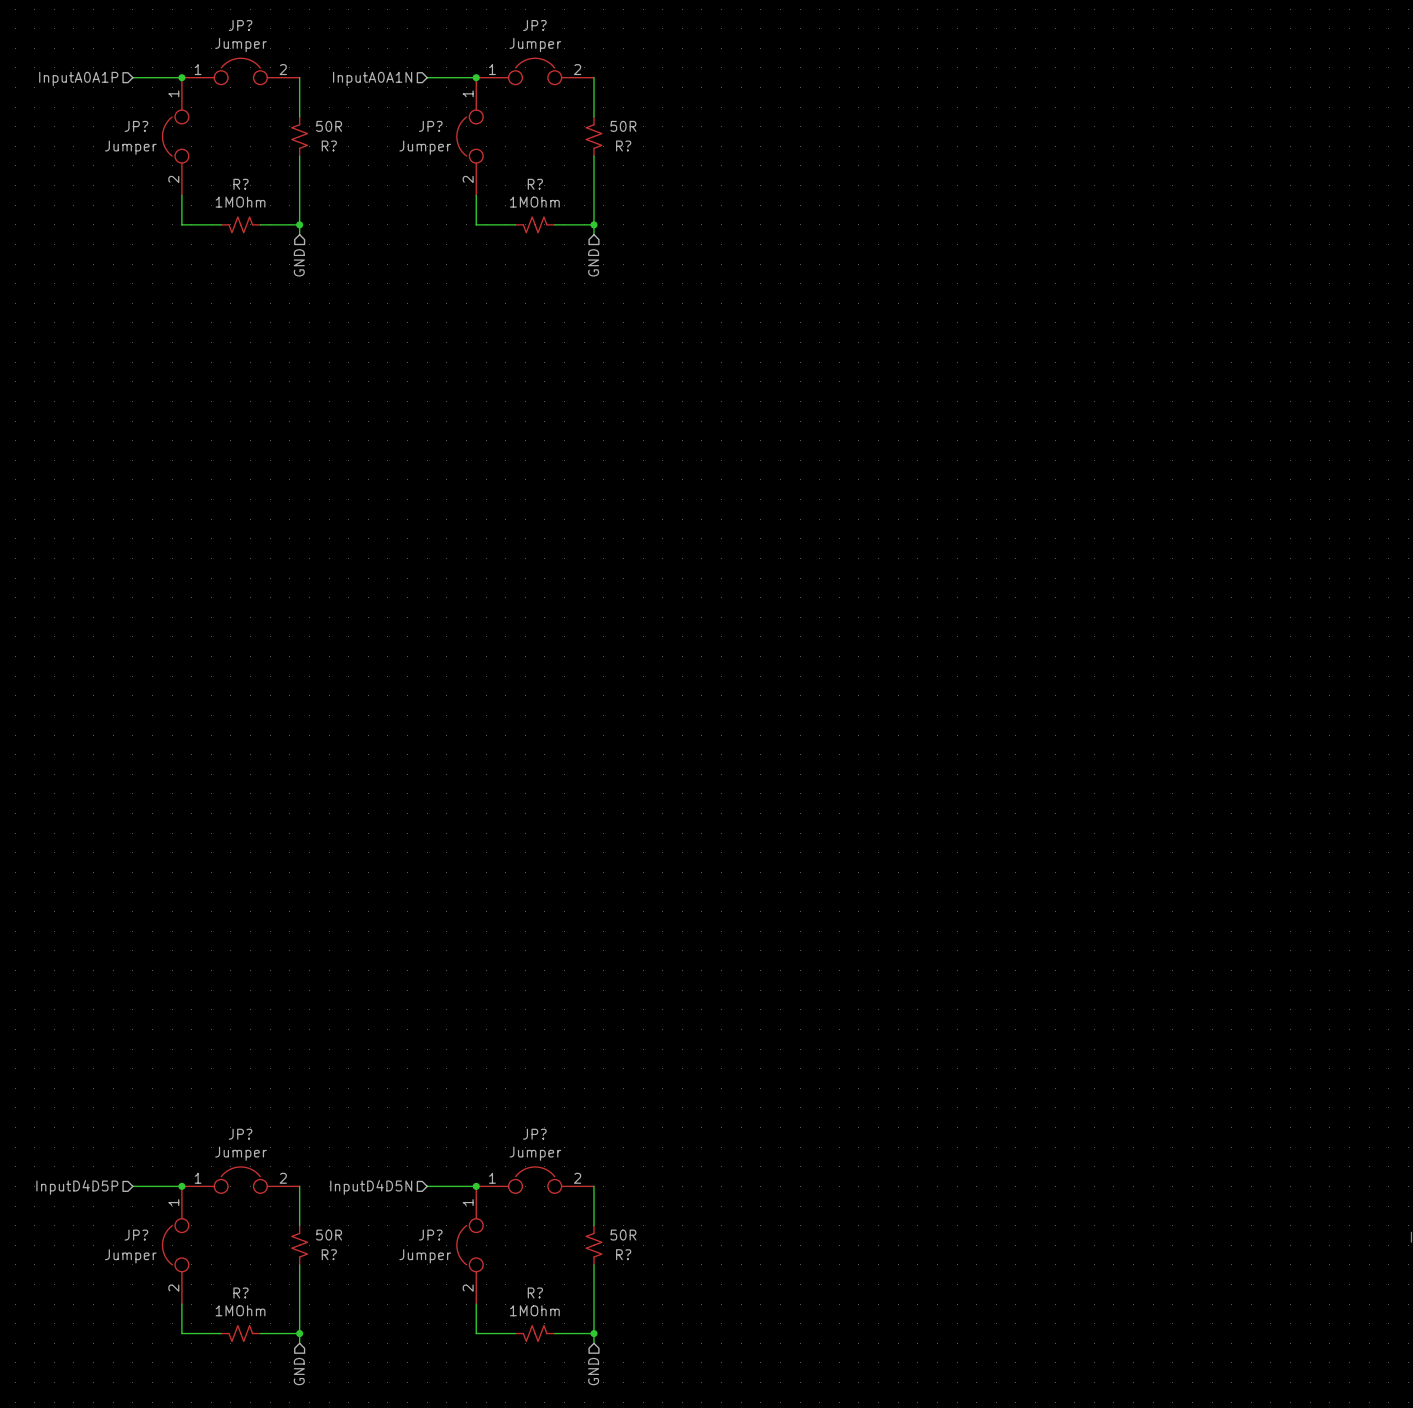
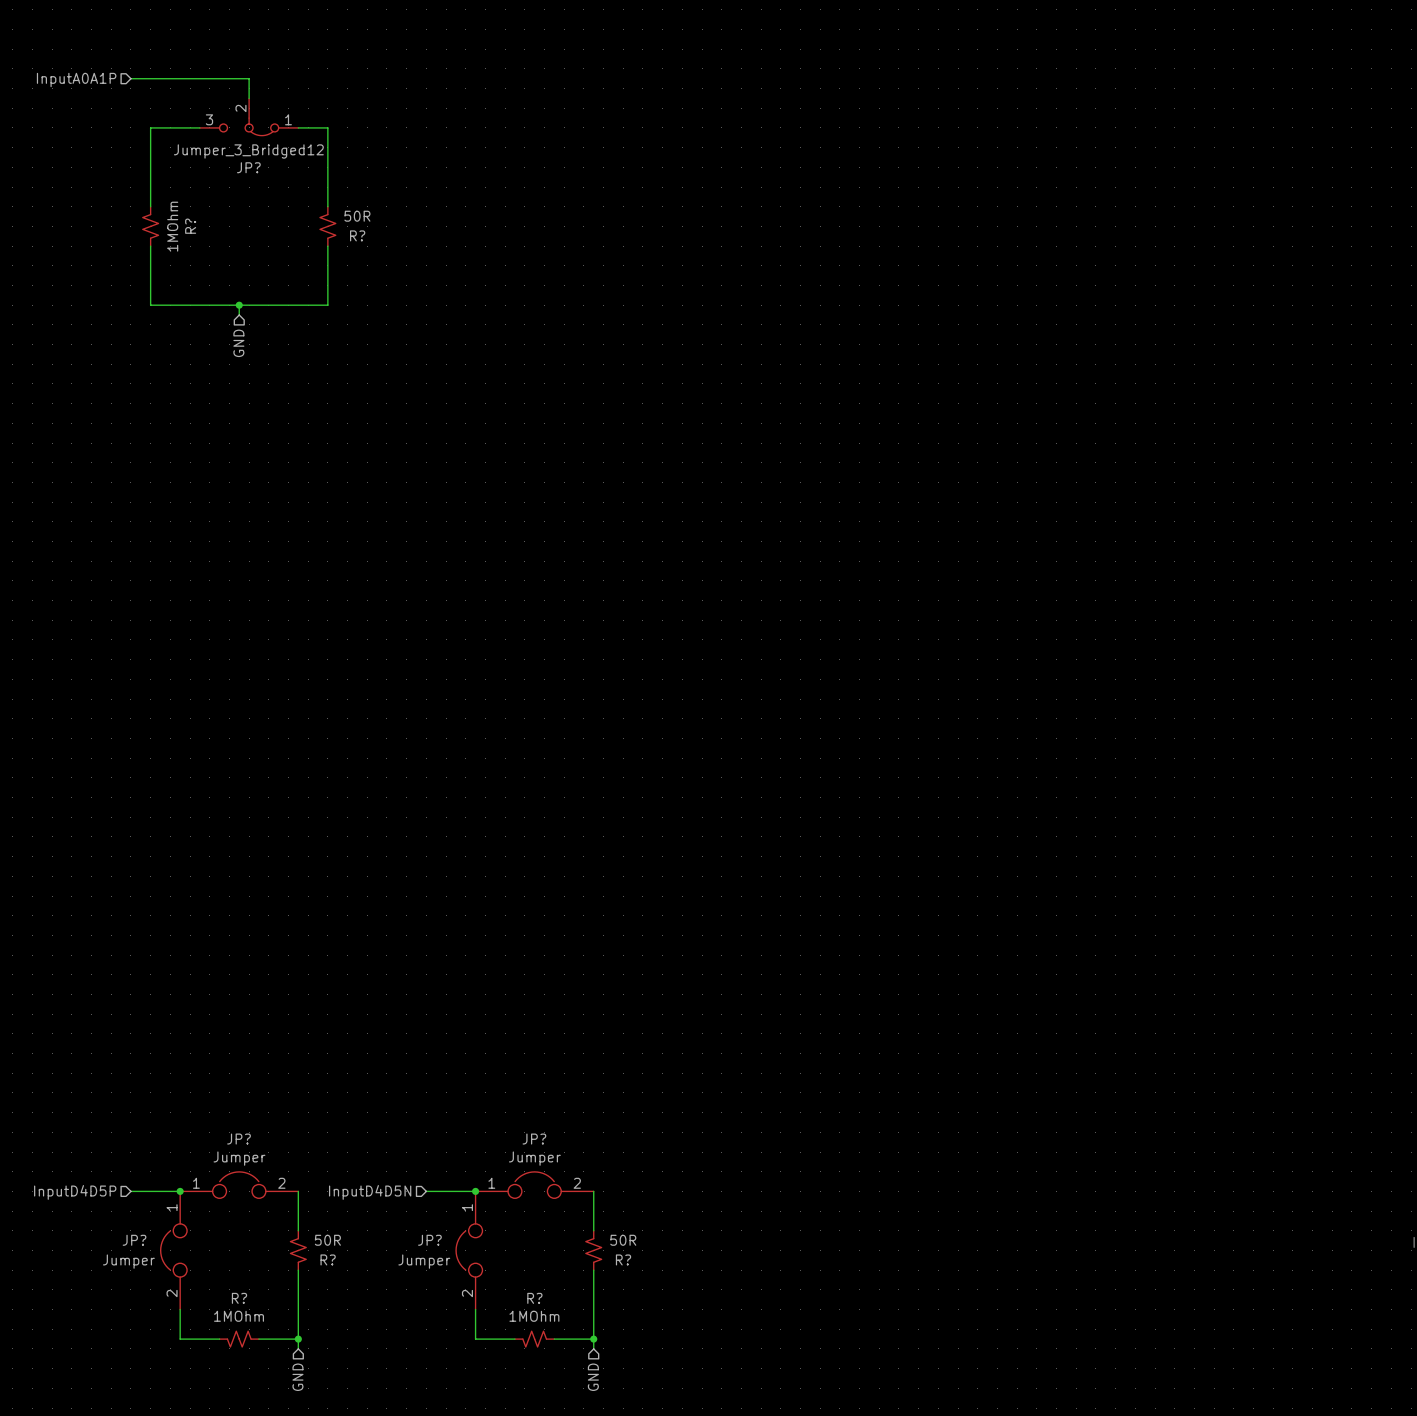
JP?: Jumper (240, 71) -> none
JP?: Jumper (535, 71) -> none
wire: none -> (180, 78) (249, 78) (249, 98)
junction: (181, 77) -> none
wire: (299, 77) (299, 116) -> none
wire: (427, 77) (476, 77) -> none
junction: (476, 77) -> none
wire: (593, 77) (593, 116) -> none
hierarchical label: InputA0A1N (372, 78) -> none
JP?: none -> Jumper_3_Bridged12 (249, 117)
wire: none -> (199, 127) (150, 127) (150, 206)
wire: none -> (298, 127) (327, 127) (327, 206)
JP?: Jumper (175, 136) -> none
R? position: (299, 136) -> (327, 226)
JP?: Jumper (469, 136) -> none
R?: 50R (593, 136) -> none
wire: (299, 156) (299, 234) -> none
wire: (593, 156) (593, 234) -> none
wire: (181, 195) (181, 224) (221, 224) -> none
wire: (476, 195) (476, 224) (515, 224) -> none
R? rotation: 0° (240, 224) -> 90° clockwise (150, 226)
R? position: (240, 224) -> (150, 226)
wire: (260, 224) (299, 224) -> none
junction: (299, 224) -> none
R?: 1MOhm (535, 224) -> none
wire: (554, 224) (593, 224) -> none
junction: (593, 224) -> none
wire: none -> (150, 246) (150, 305) (327, 305) (327, 246)
hierarchical label position: GND (299, 262) -> GND (238, 343)
hierarchical label: GND (593, 262) -> none
wire: none -> (239, 305) (239, 315)
junction: none -> (239, 305)

